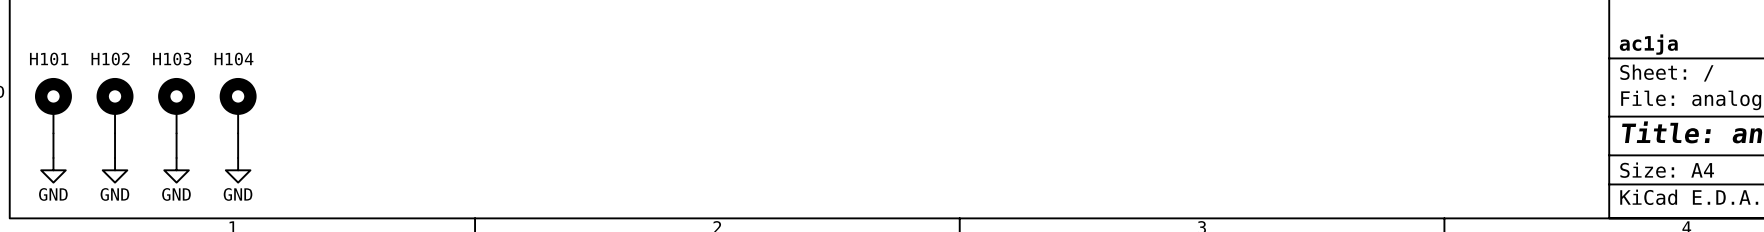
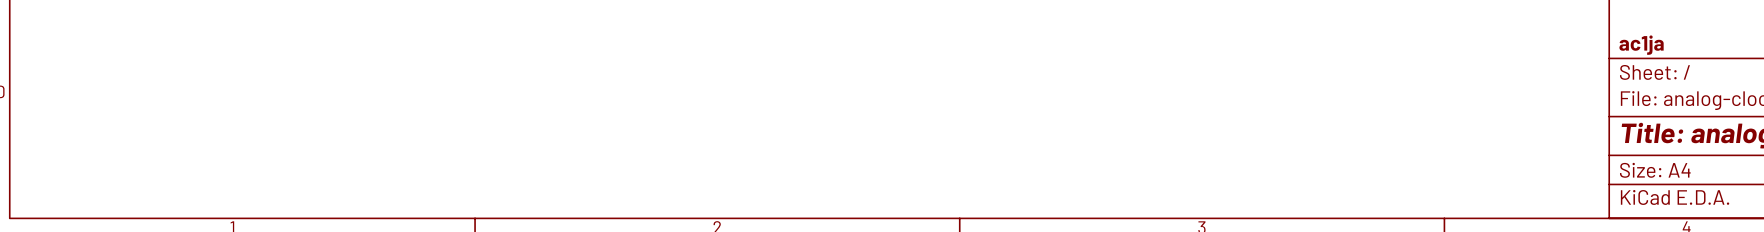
H101: (53, 105) -> none
H102: (115, 105) -> none
H103: (176, 105) -> none
H104: (238, 105) -> none
wire: (53, 133) (53, 157) -> none
wire: (115, 133) (115, 157) -> none
wire: (176, 133) (176, 157) -> none
wire: (238, 133) (238, 157) -> none
power symbol: GND (53, 170) -> none
power symbol: GND (115, 170) -> none
power symbol: GND (176, 170) -> none
power symbol: GND (238, 170) -> none

